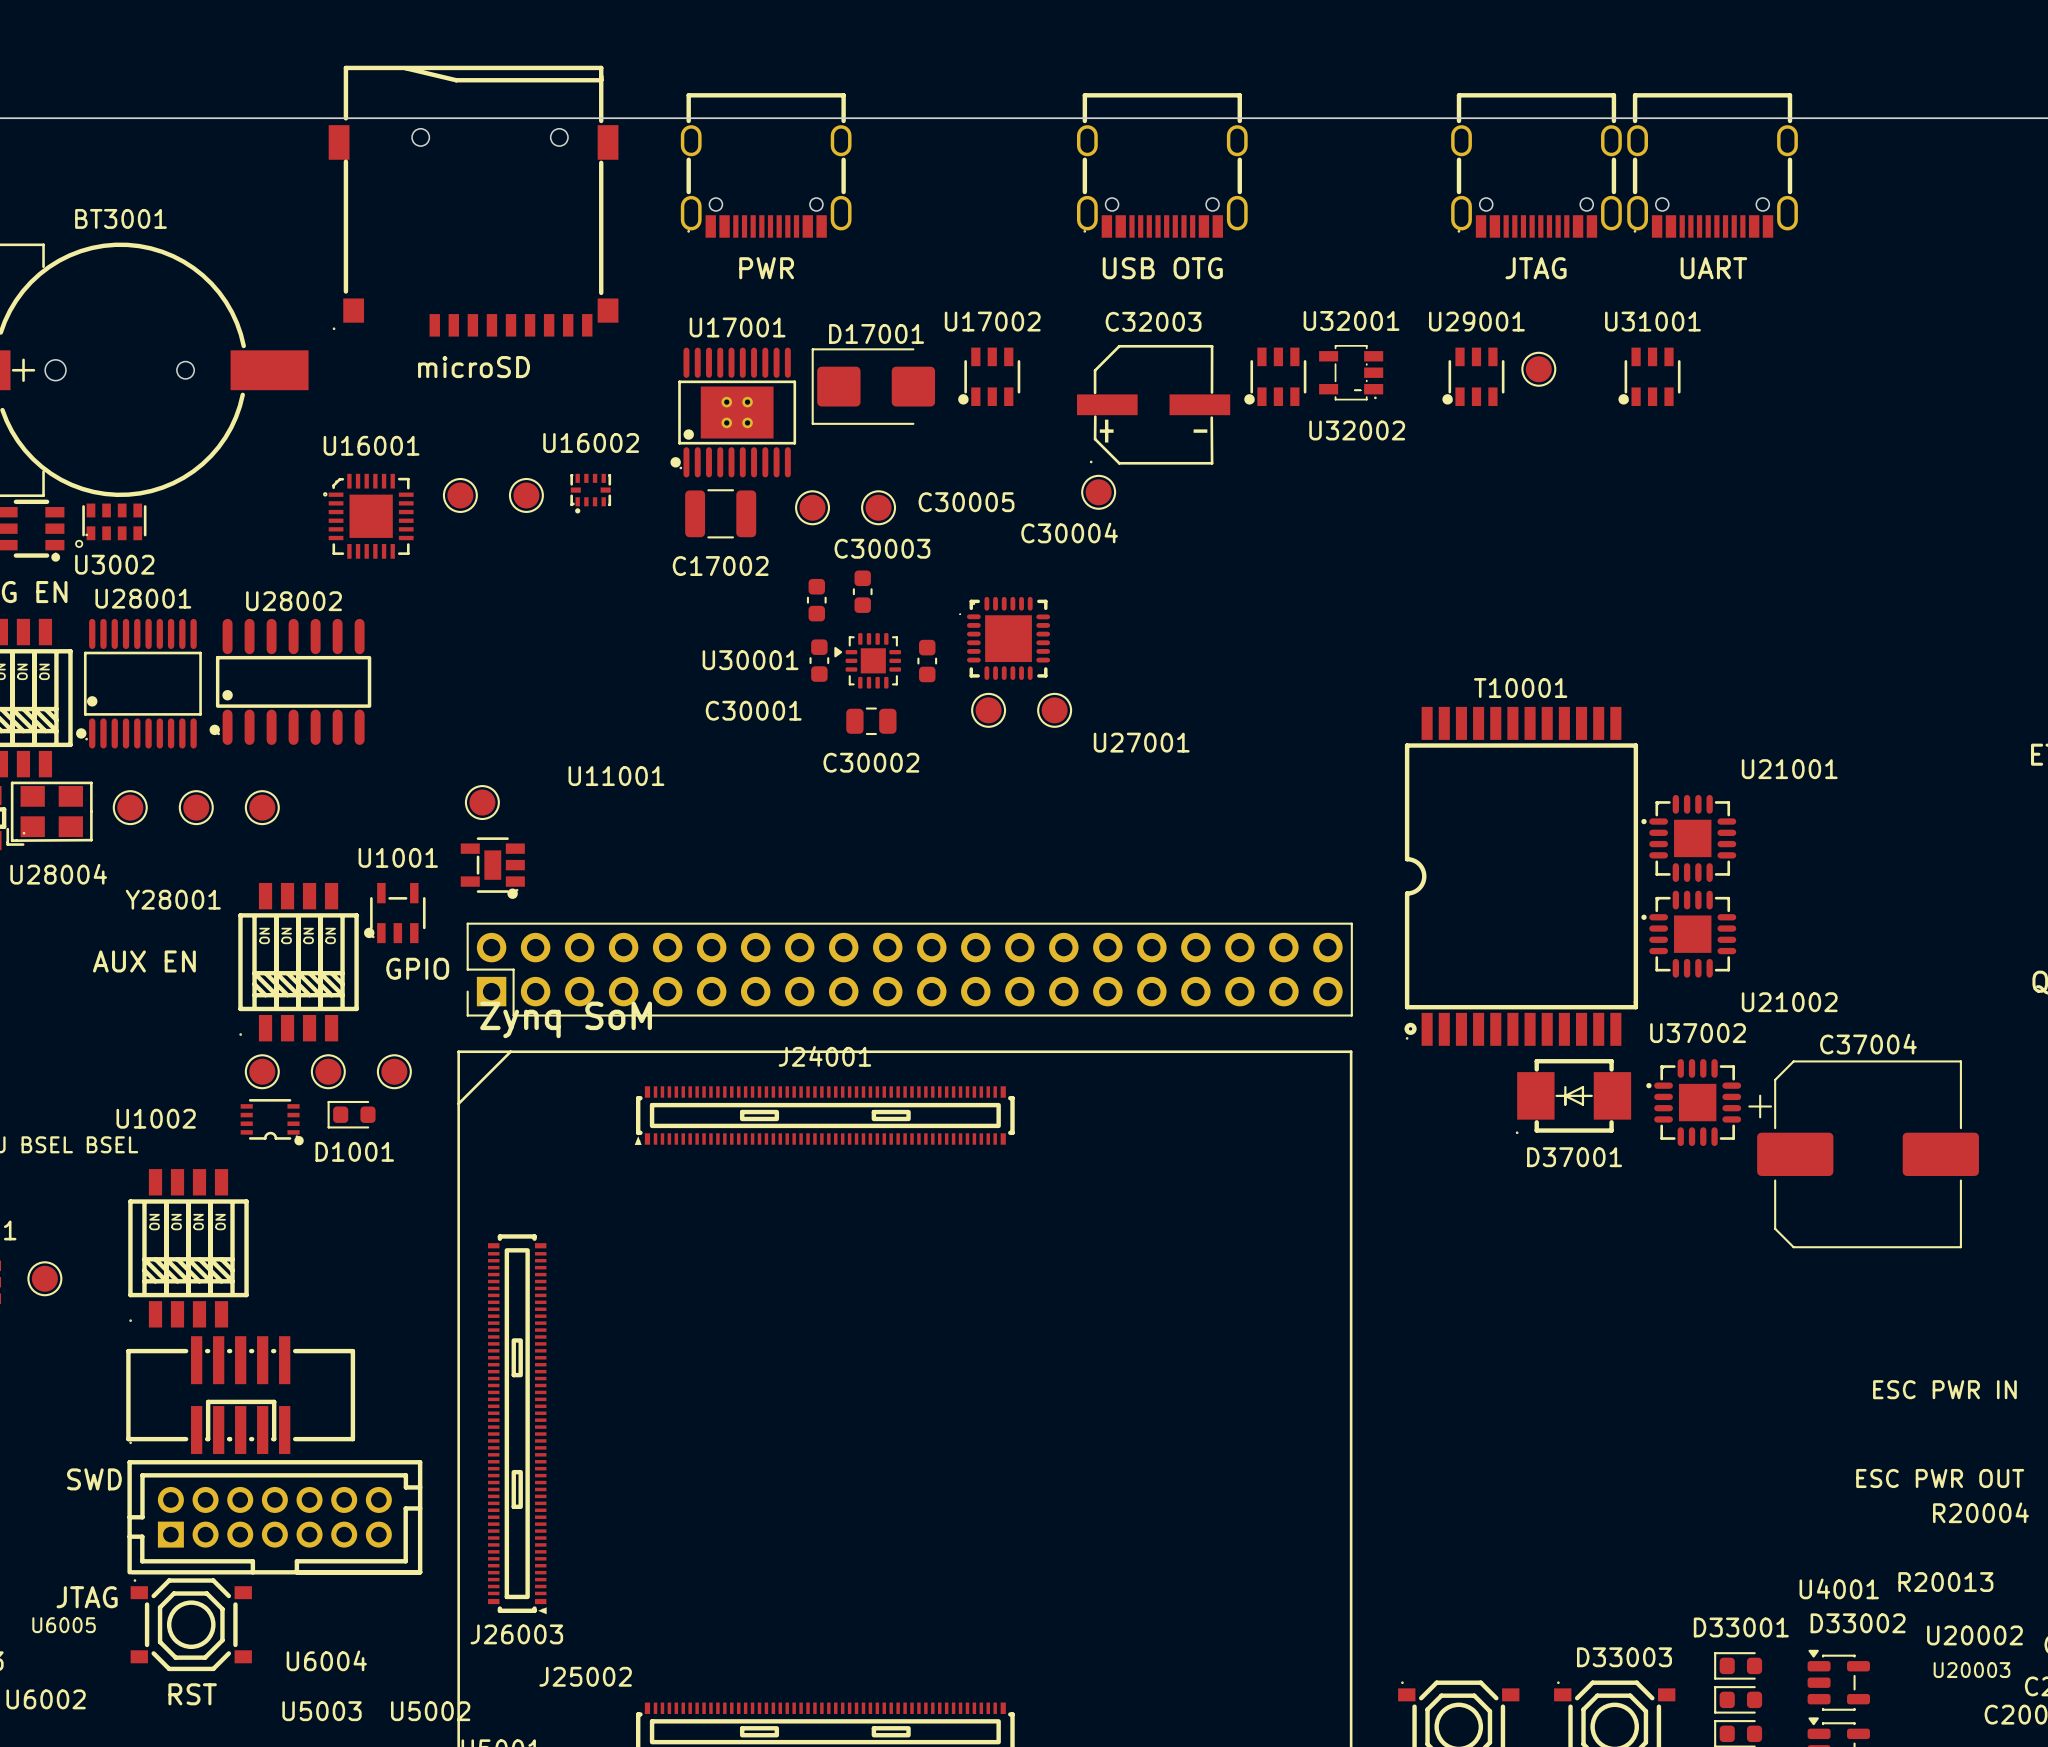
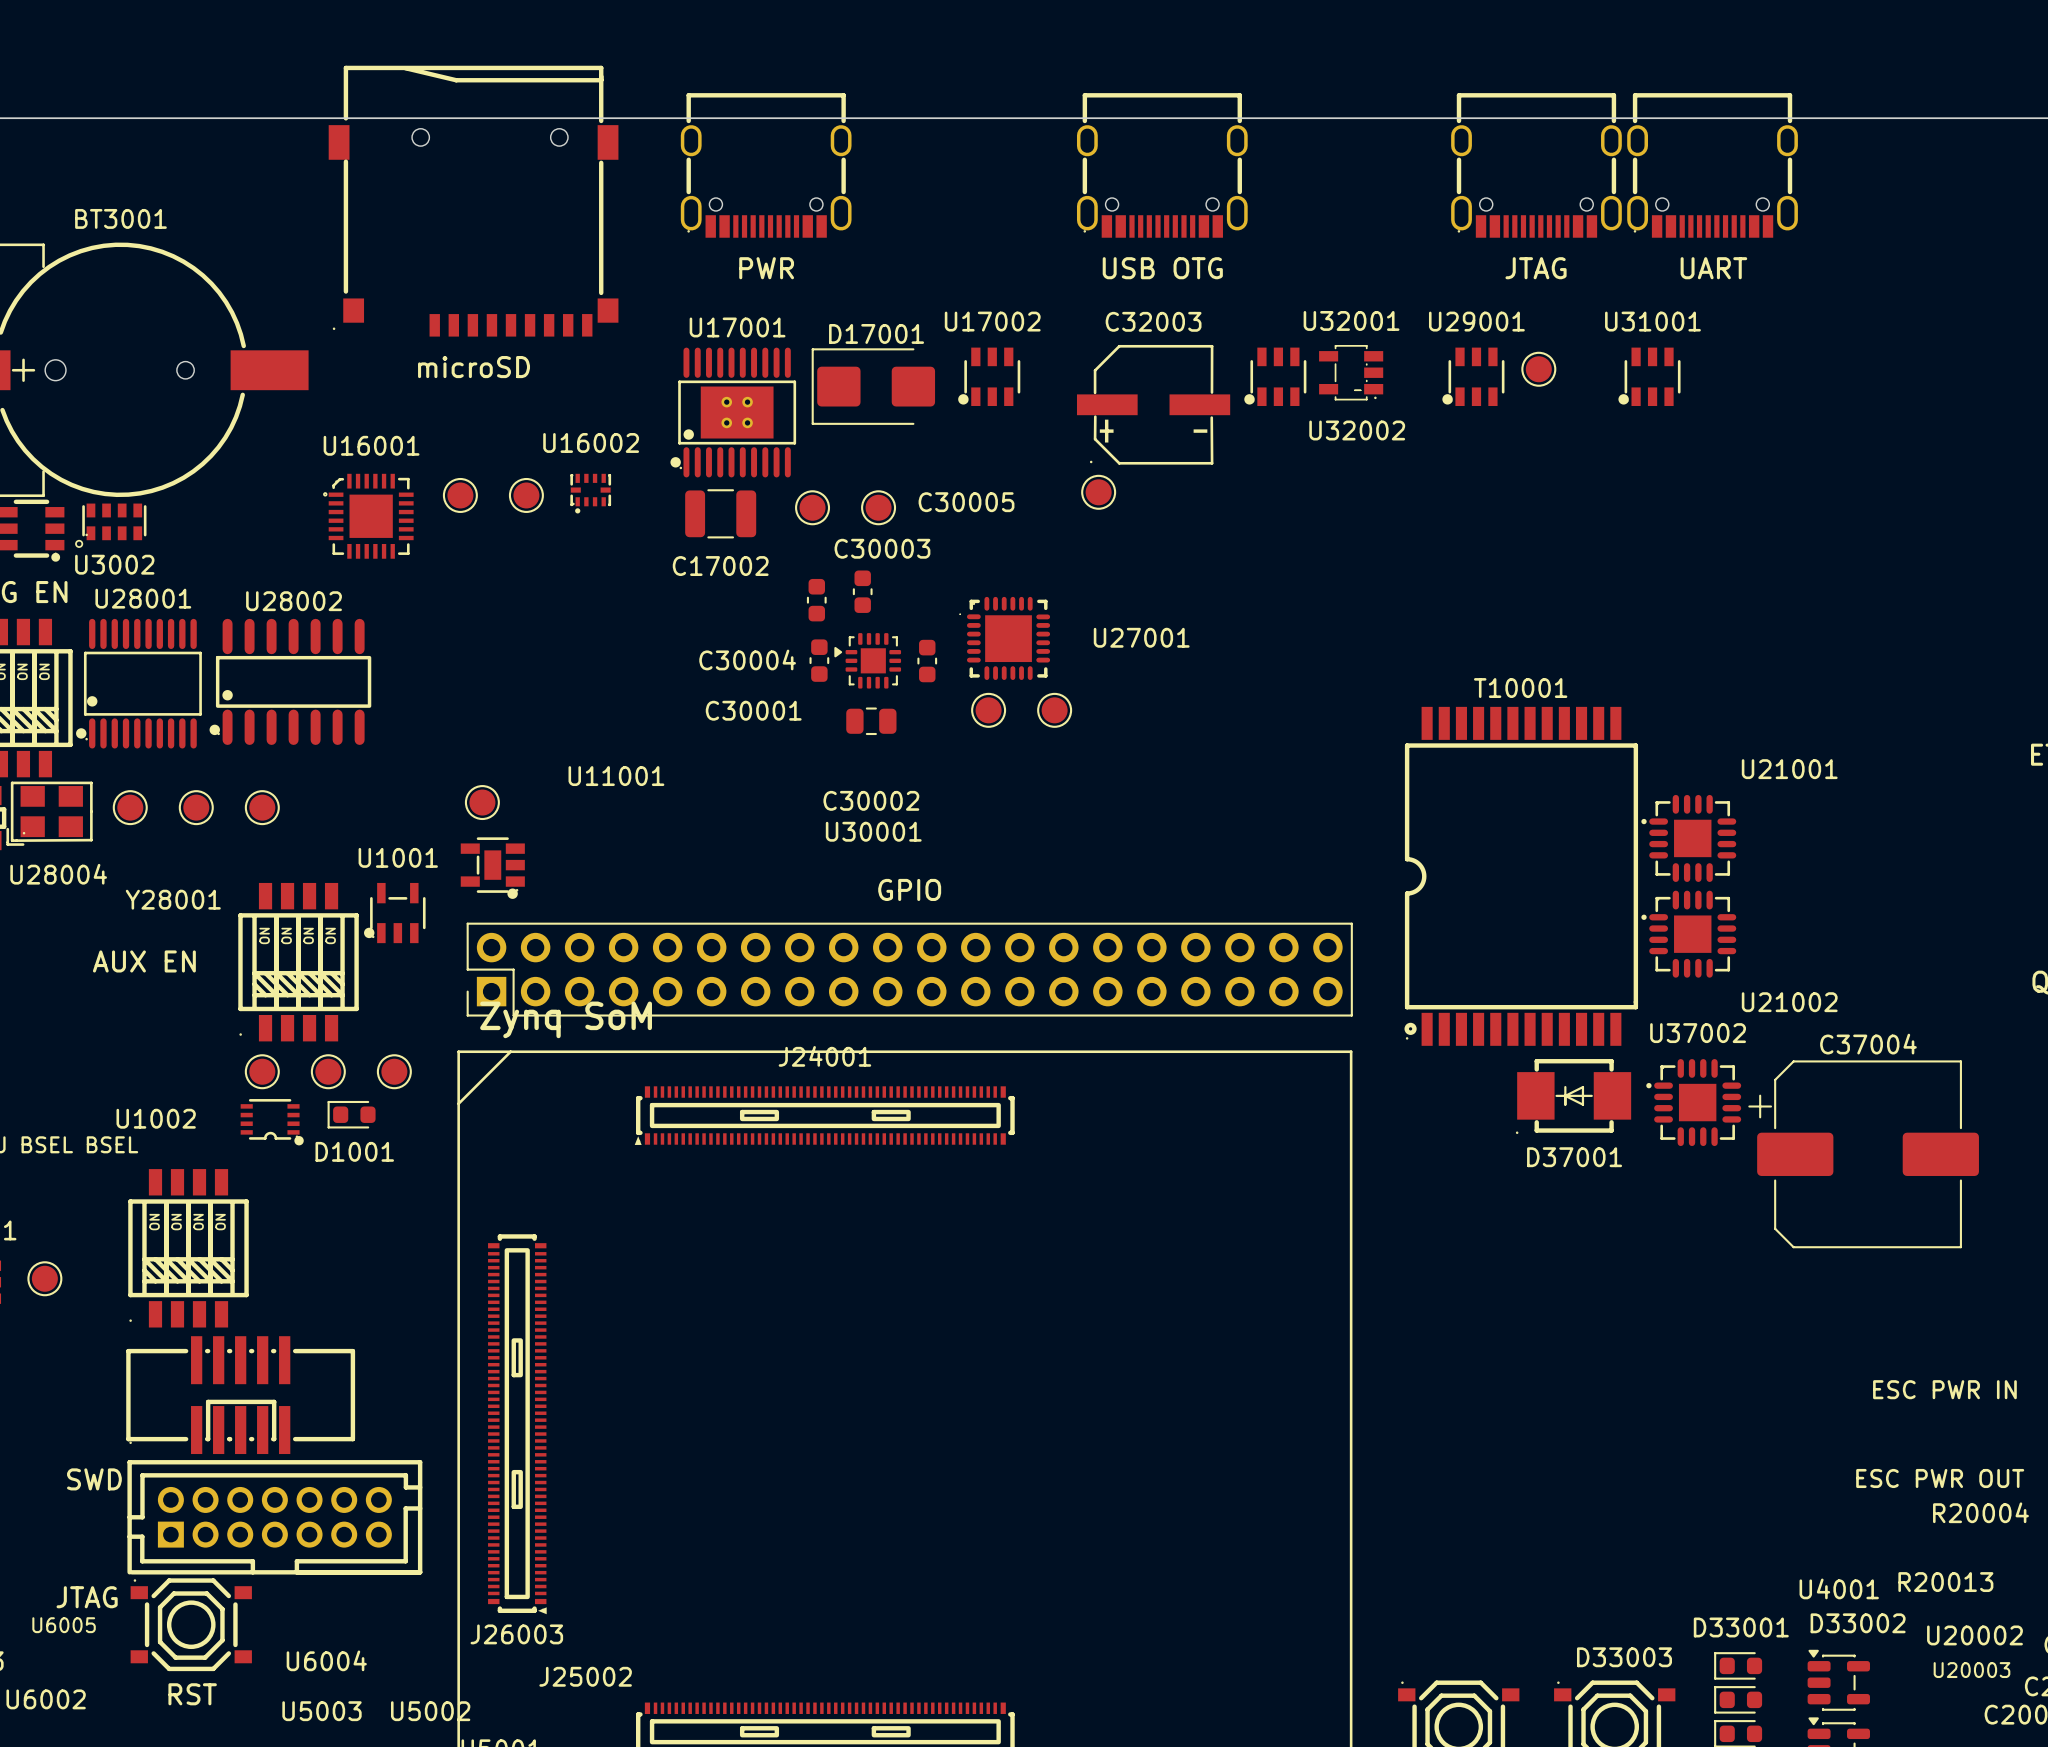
C30004 name position: C30004 (1069, 532) -> C30004 (747, 659)
U30001 name position: U30001 (750, 660) -> U30001 (873, 831)
U27001 name position: U27001 (1141, 742) -> U27001 (1141, 637)
C30002 name position: C30002 (871, 762) -> C30002 (871, 800)
text: none -> GPIO (909, 889)
text: GPIO (417, 968) -> none

